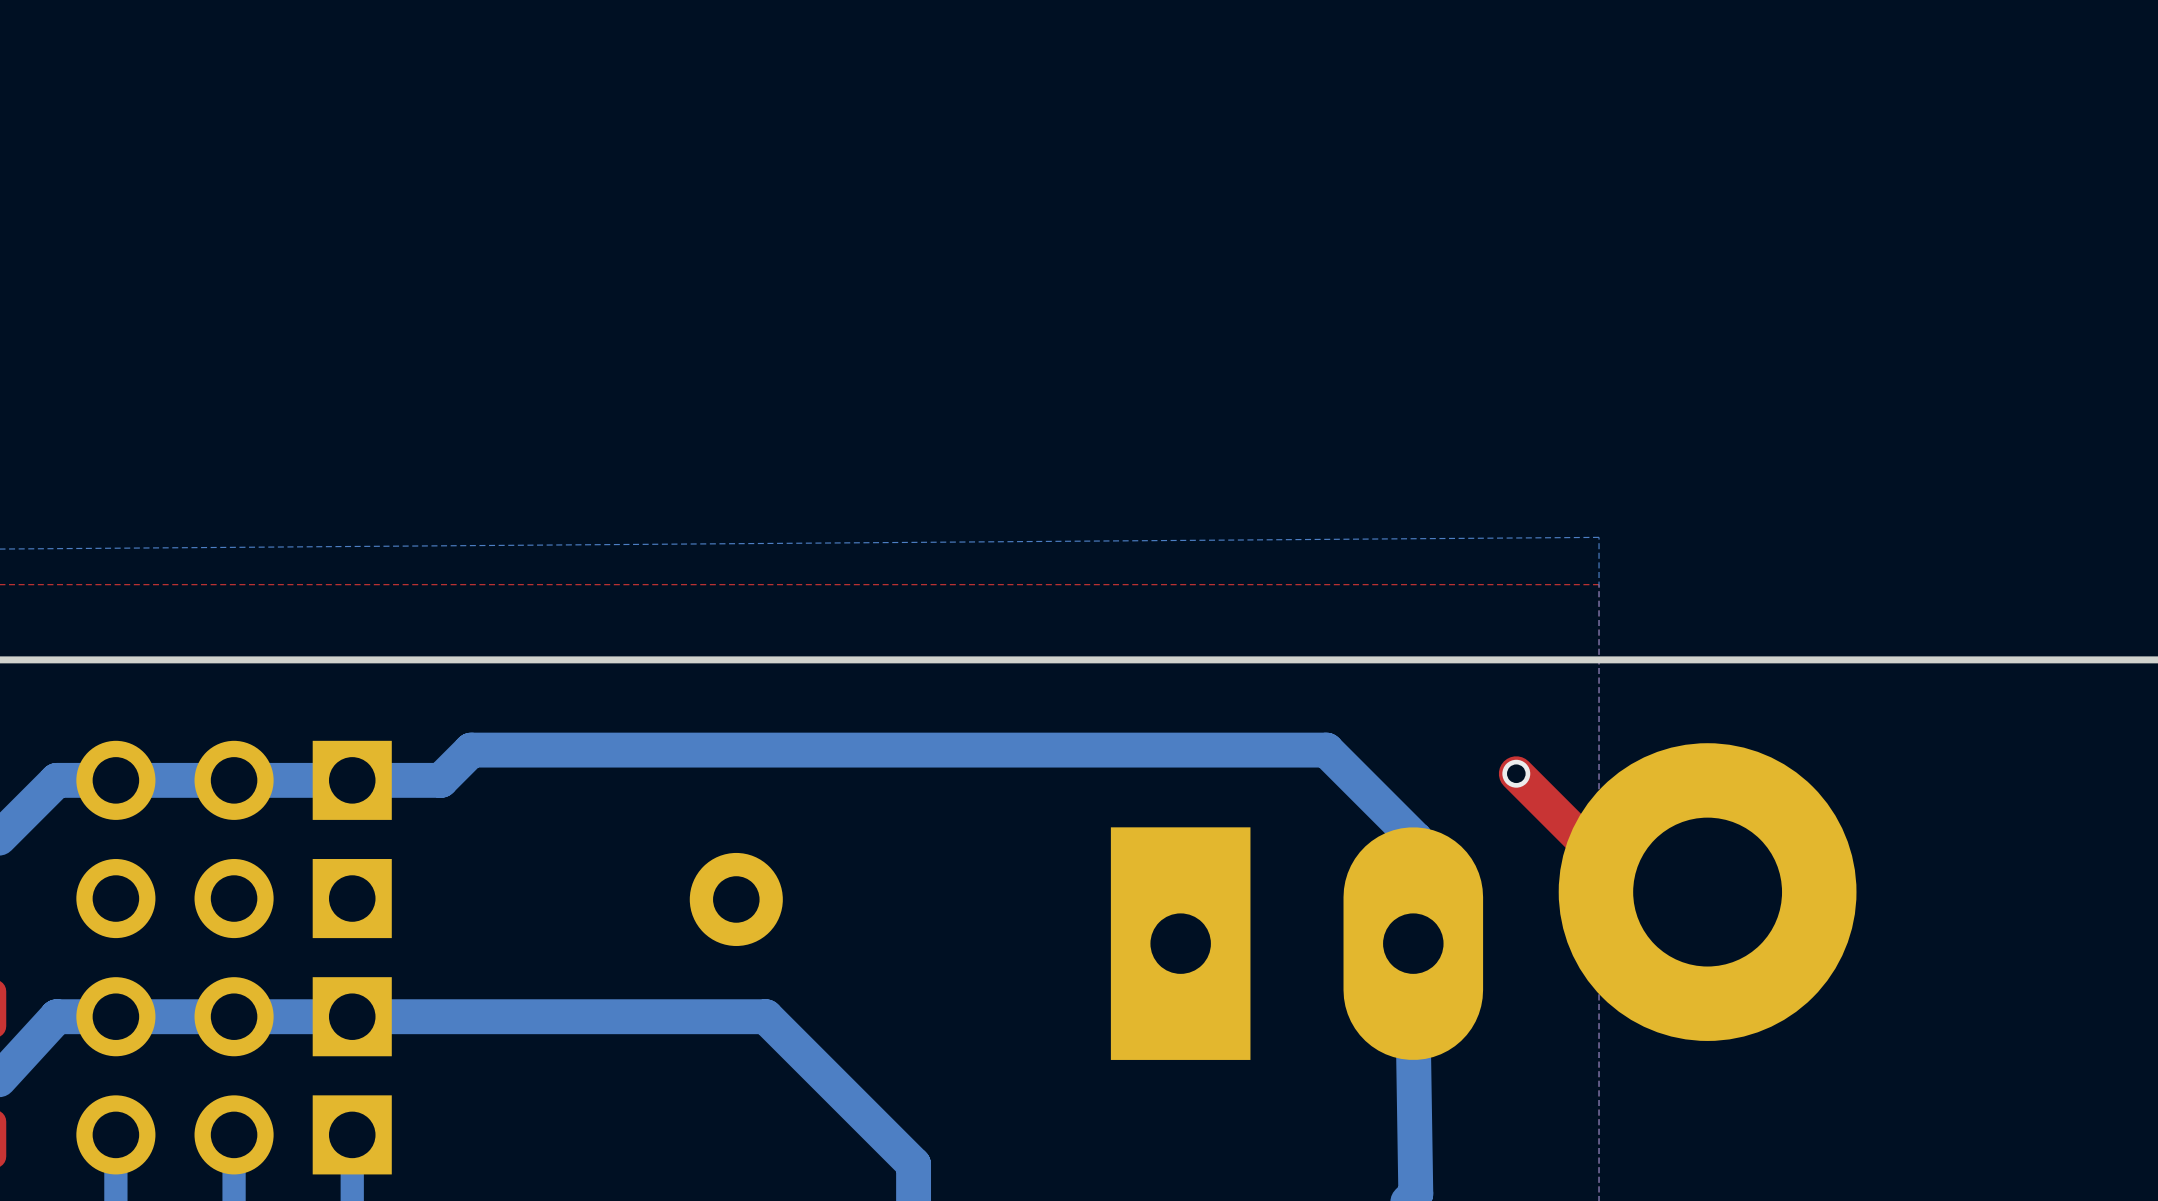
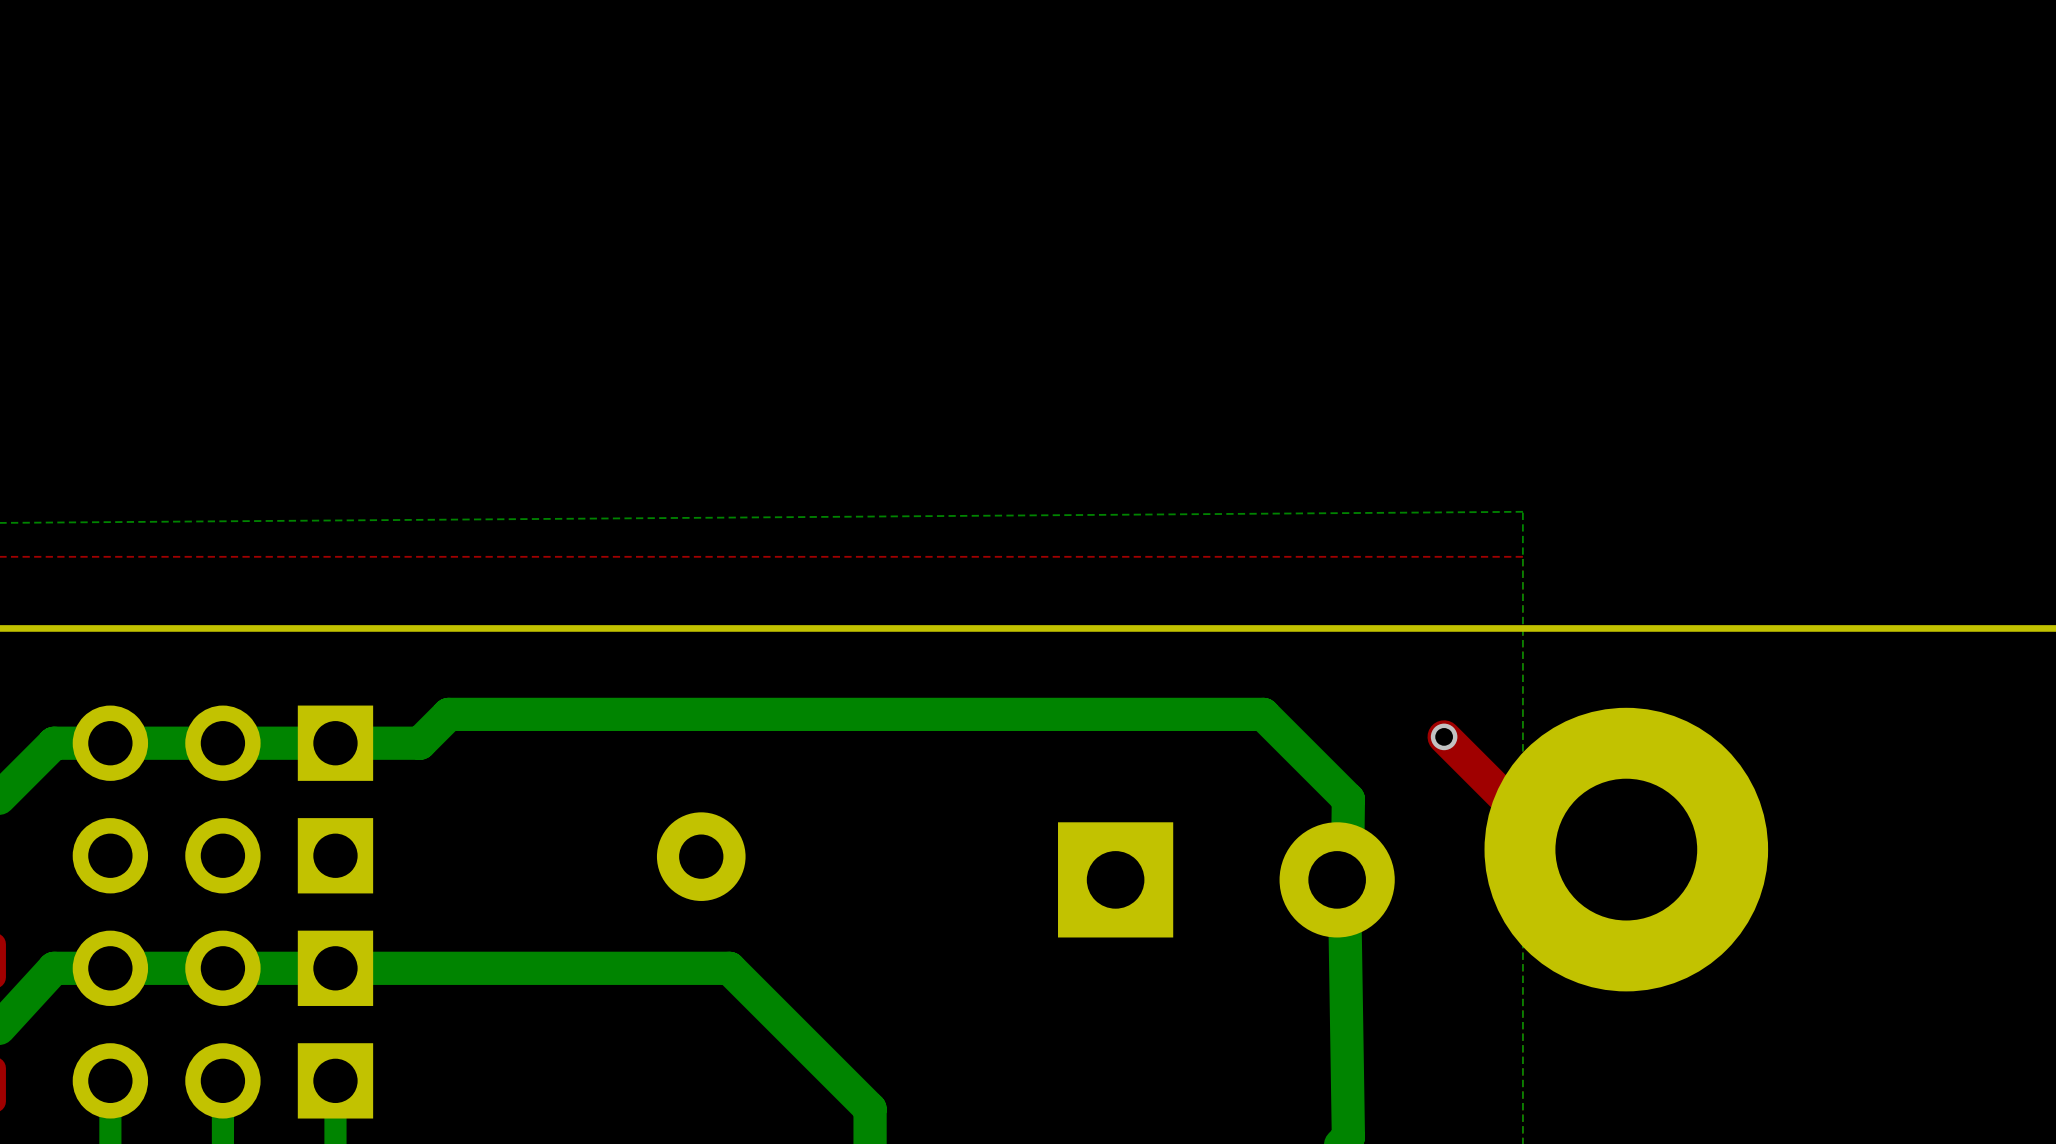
part footprint: [1110, 827, 1484, 1060] -> [1058, 822, 1395, 938]

